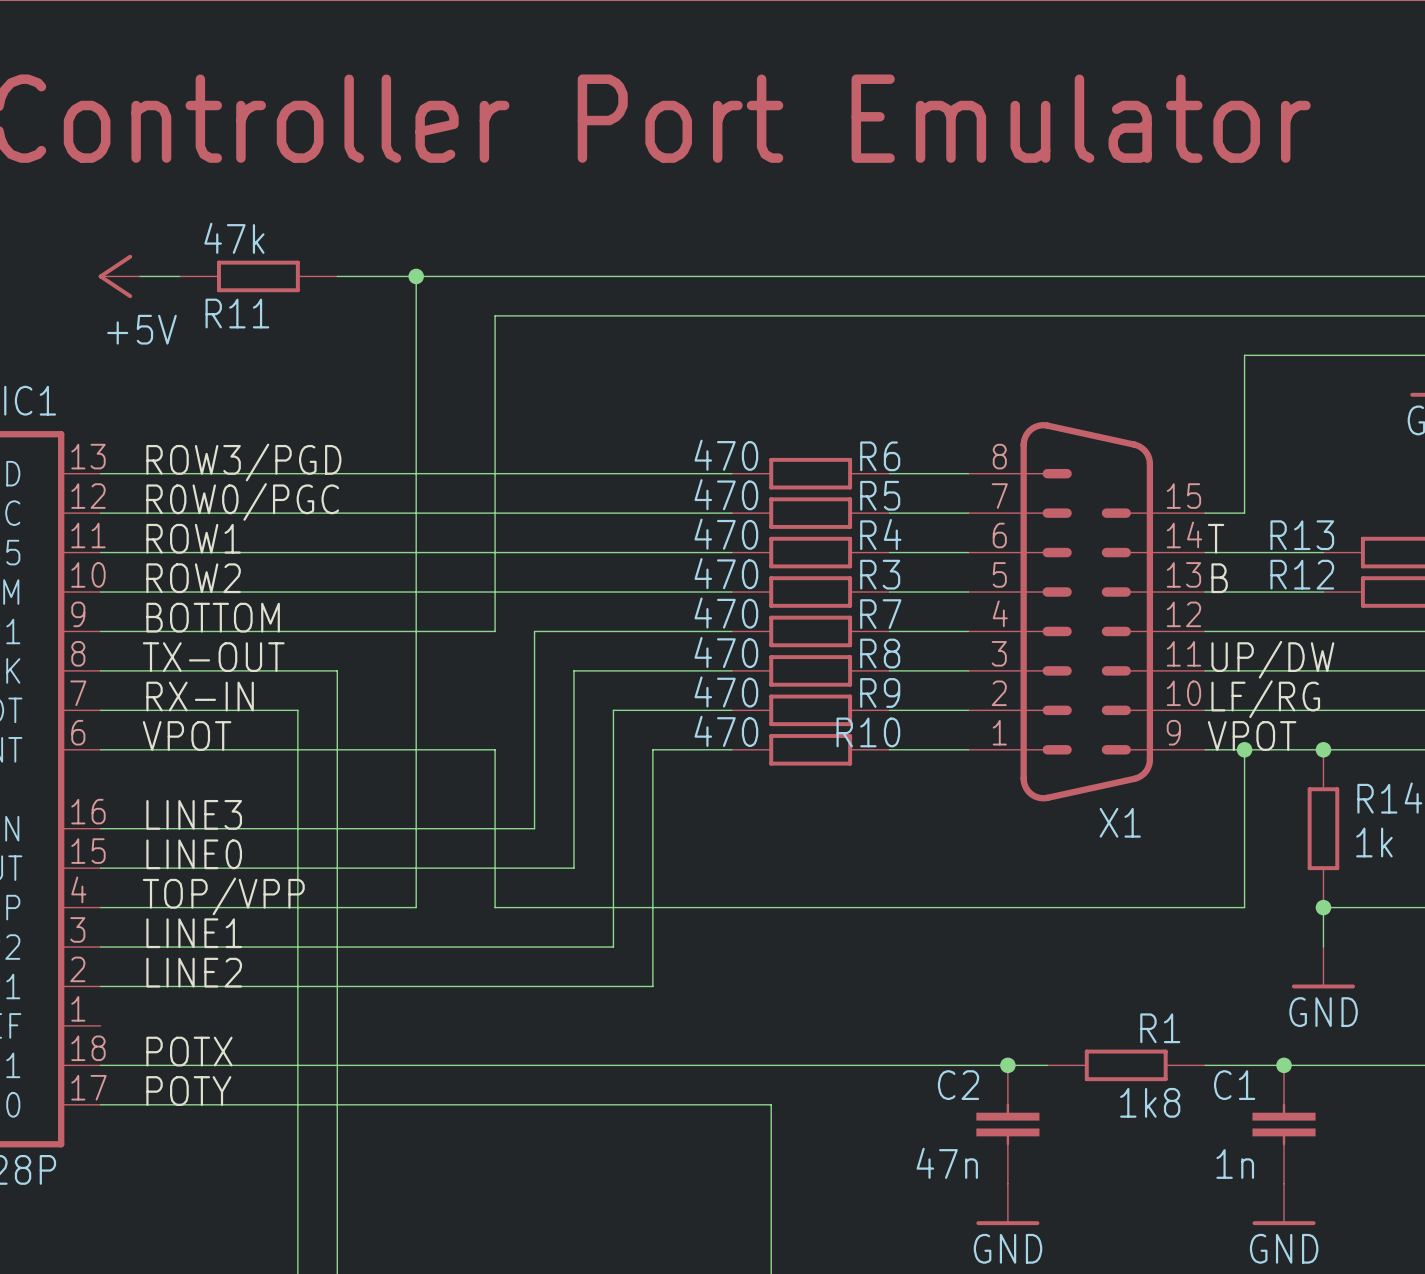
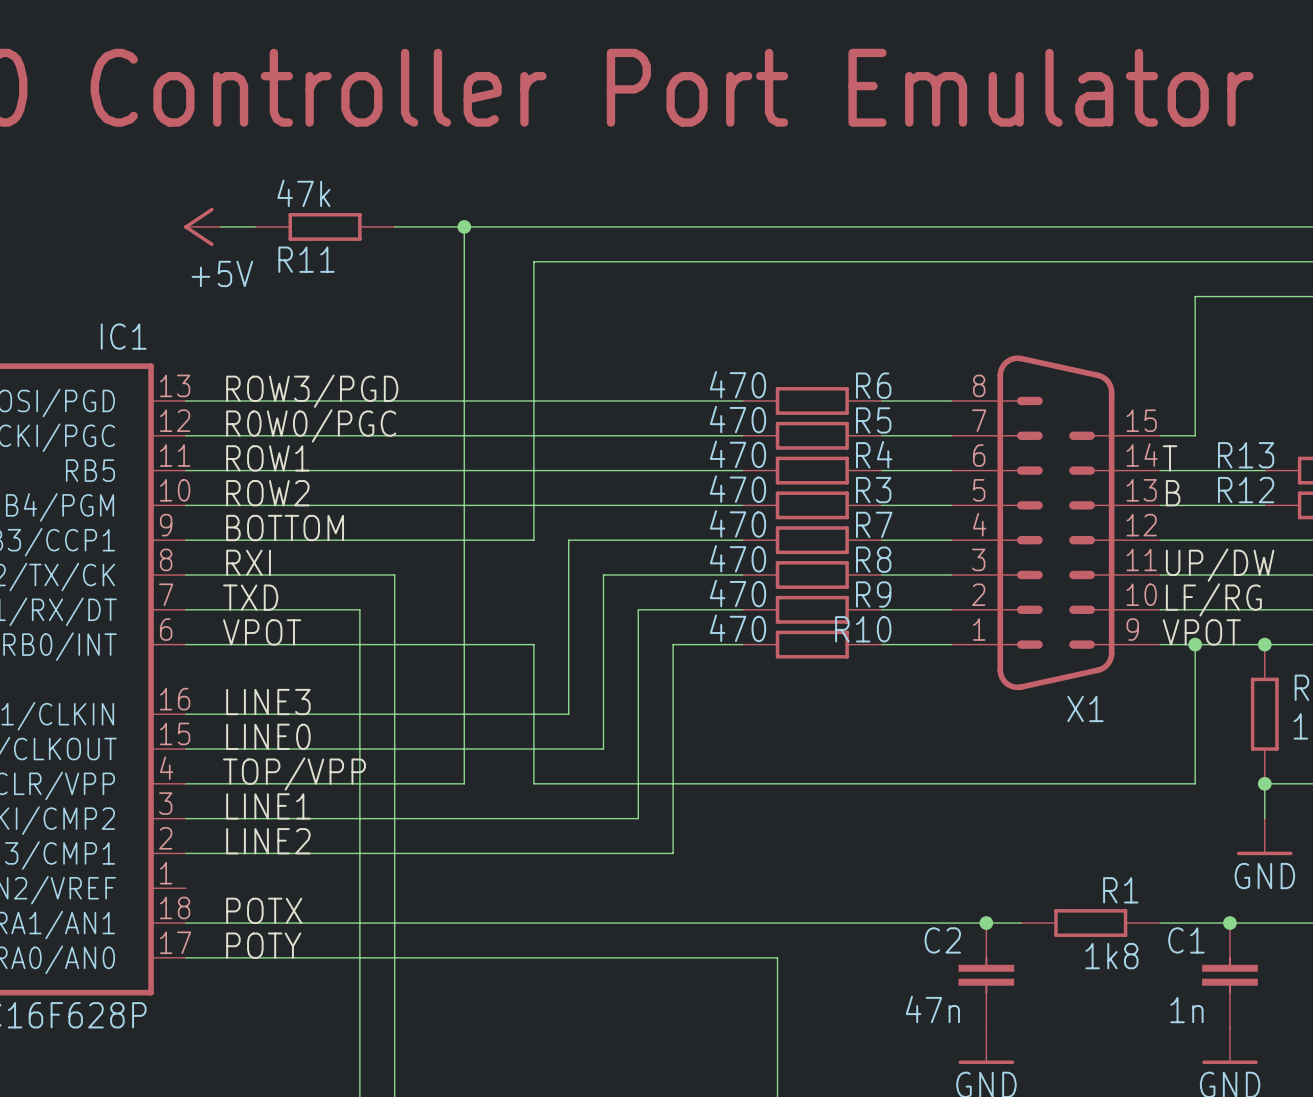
label: TX-OUT (213, 657) -> RXI (248, 562)
label: RX-IN (200, 696) -> TXD (250, 597)

